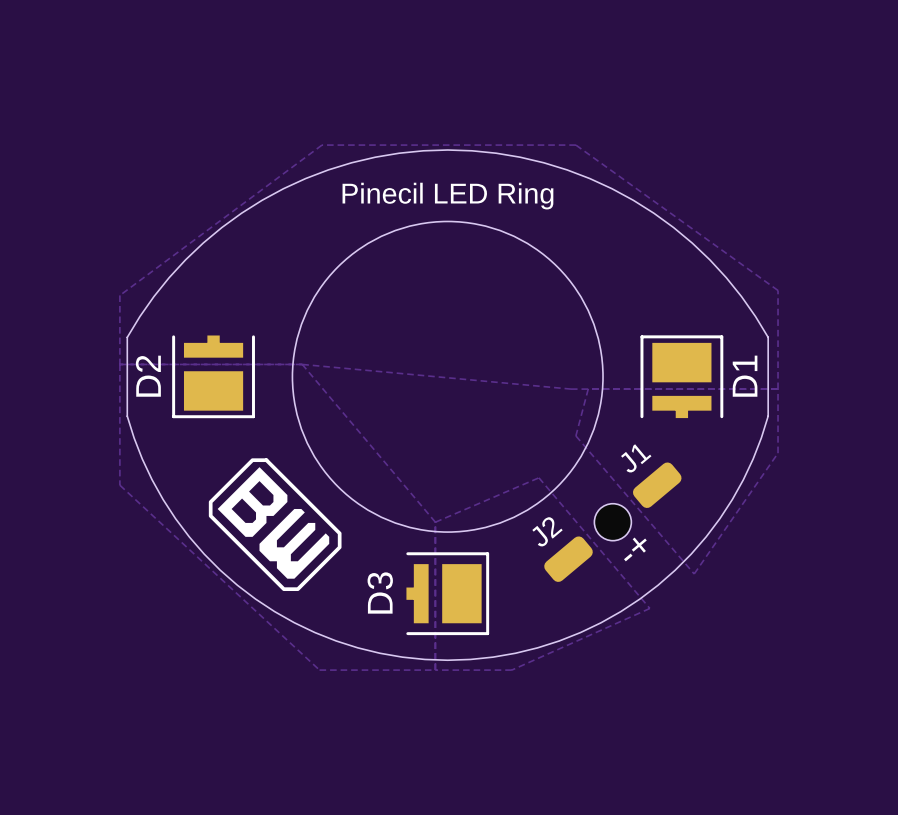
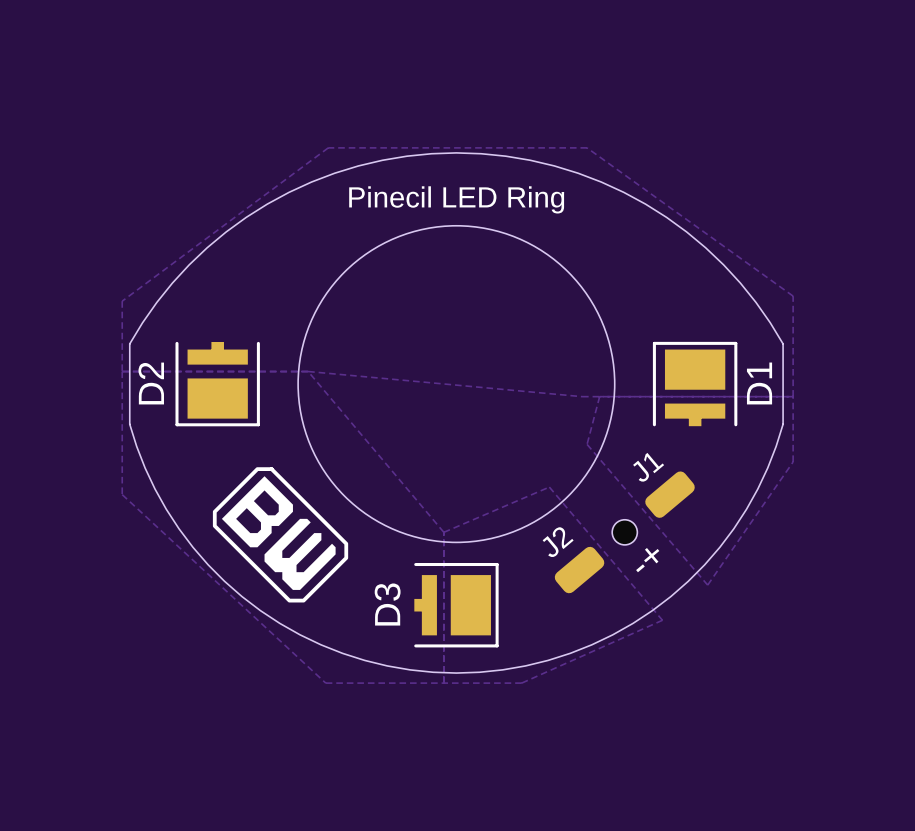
part footprint: [594, 503, 632, 541] -> [612, 519, 638, 545]

